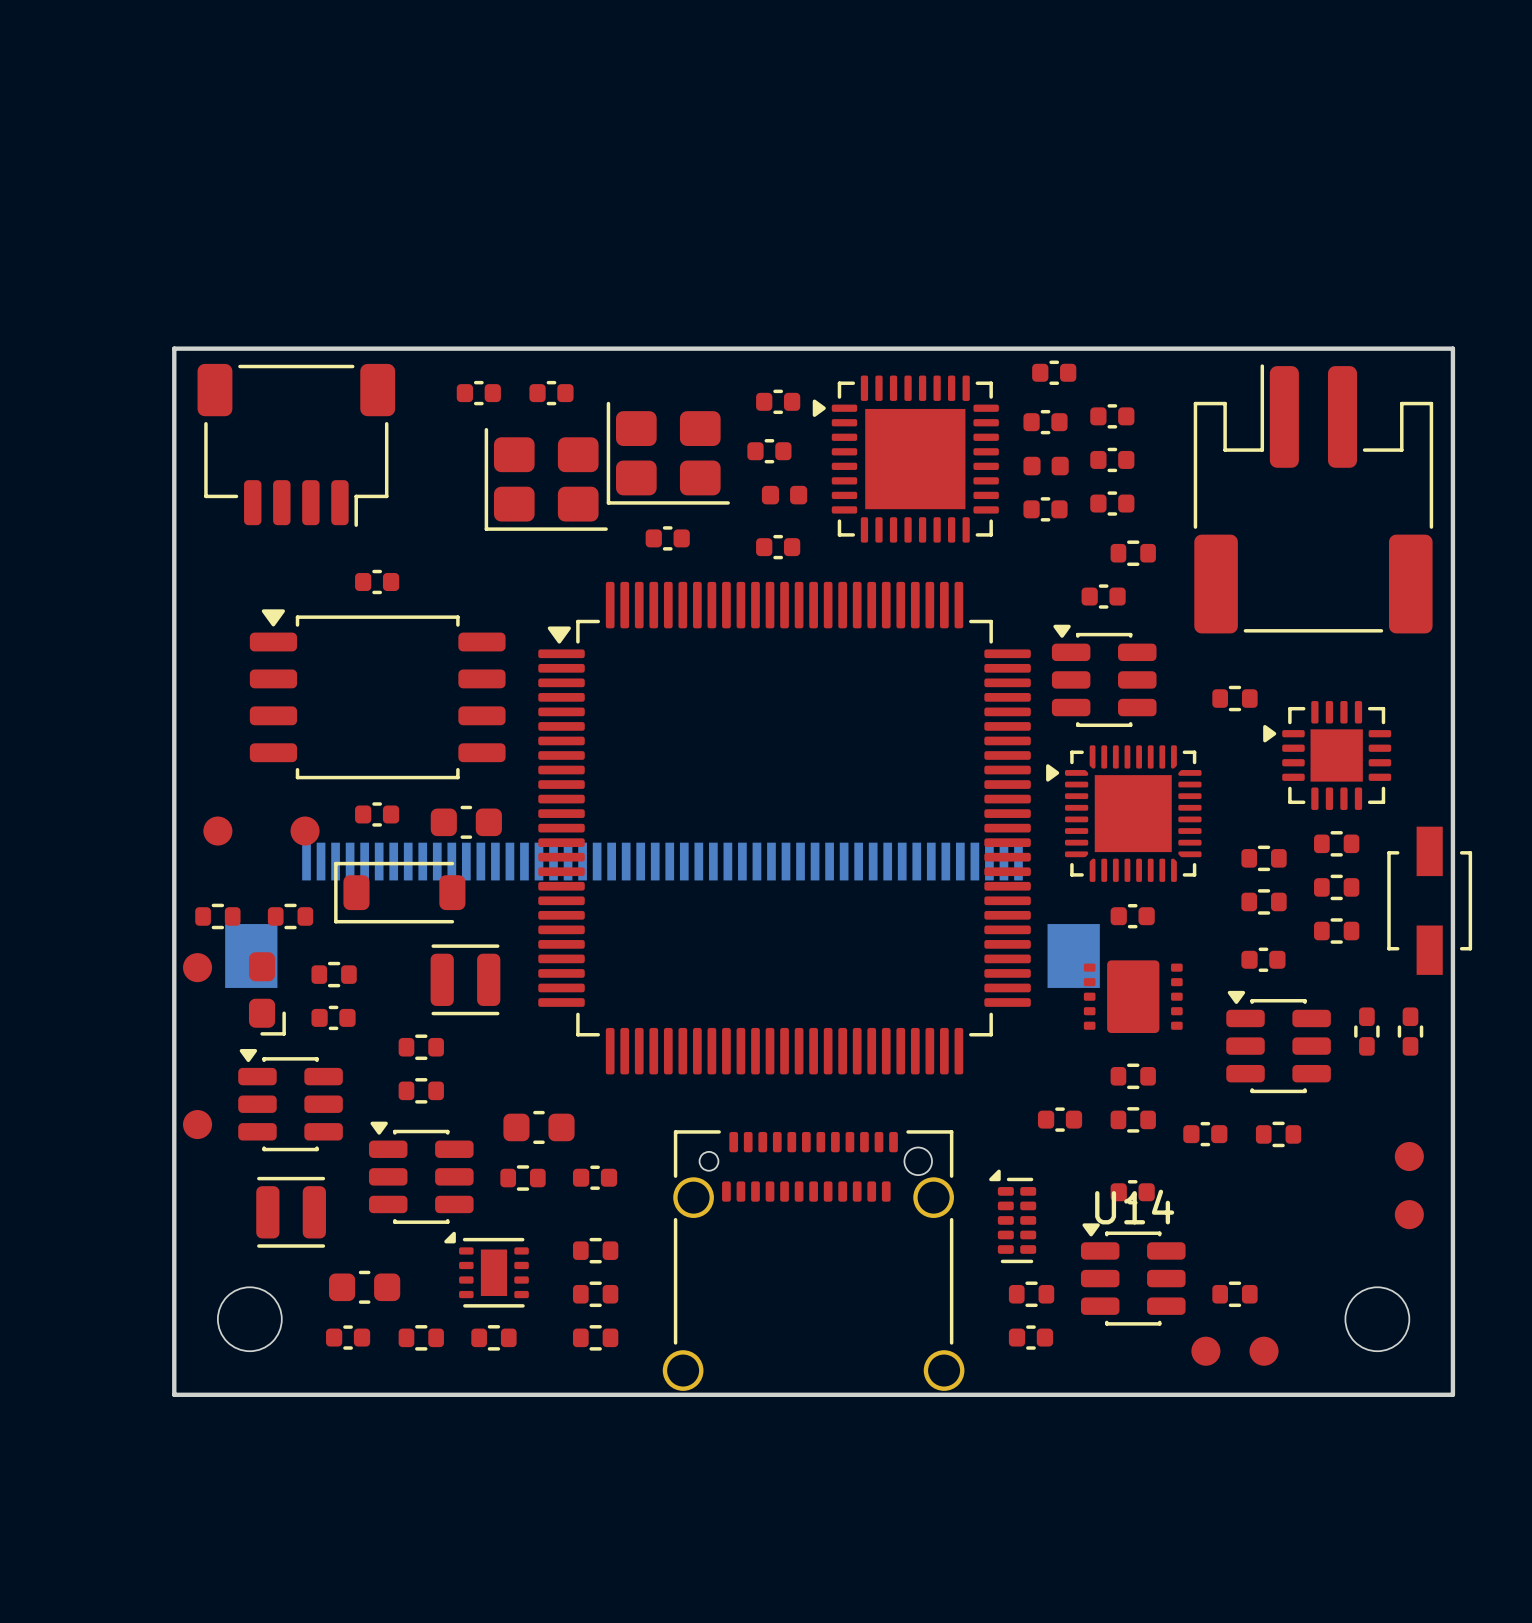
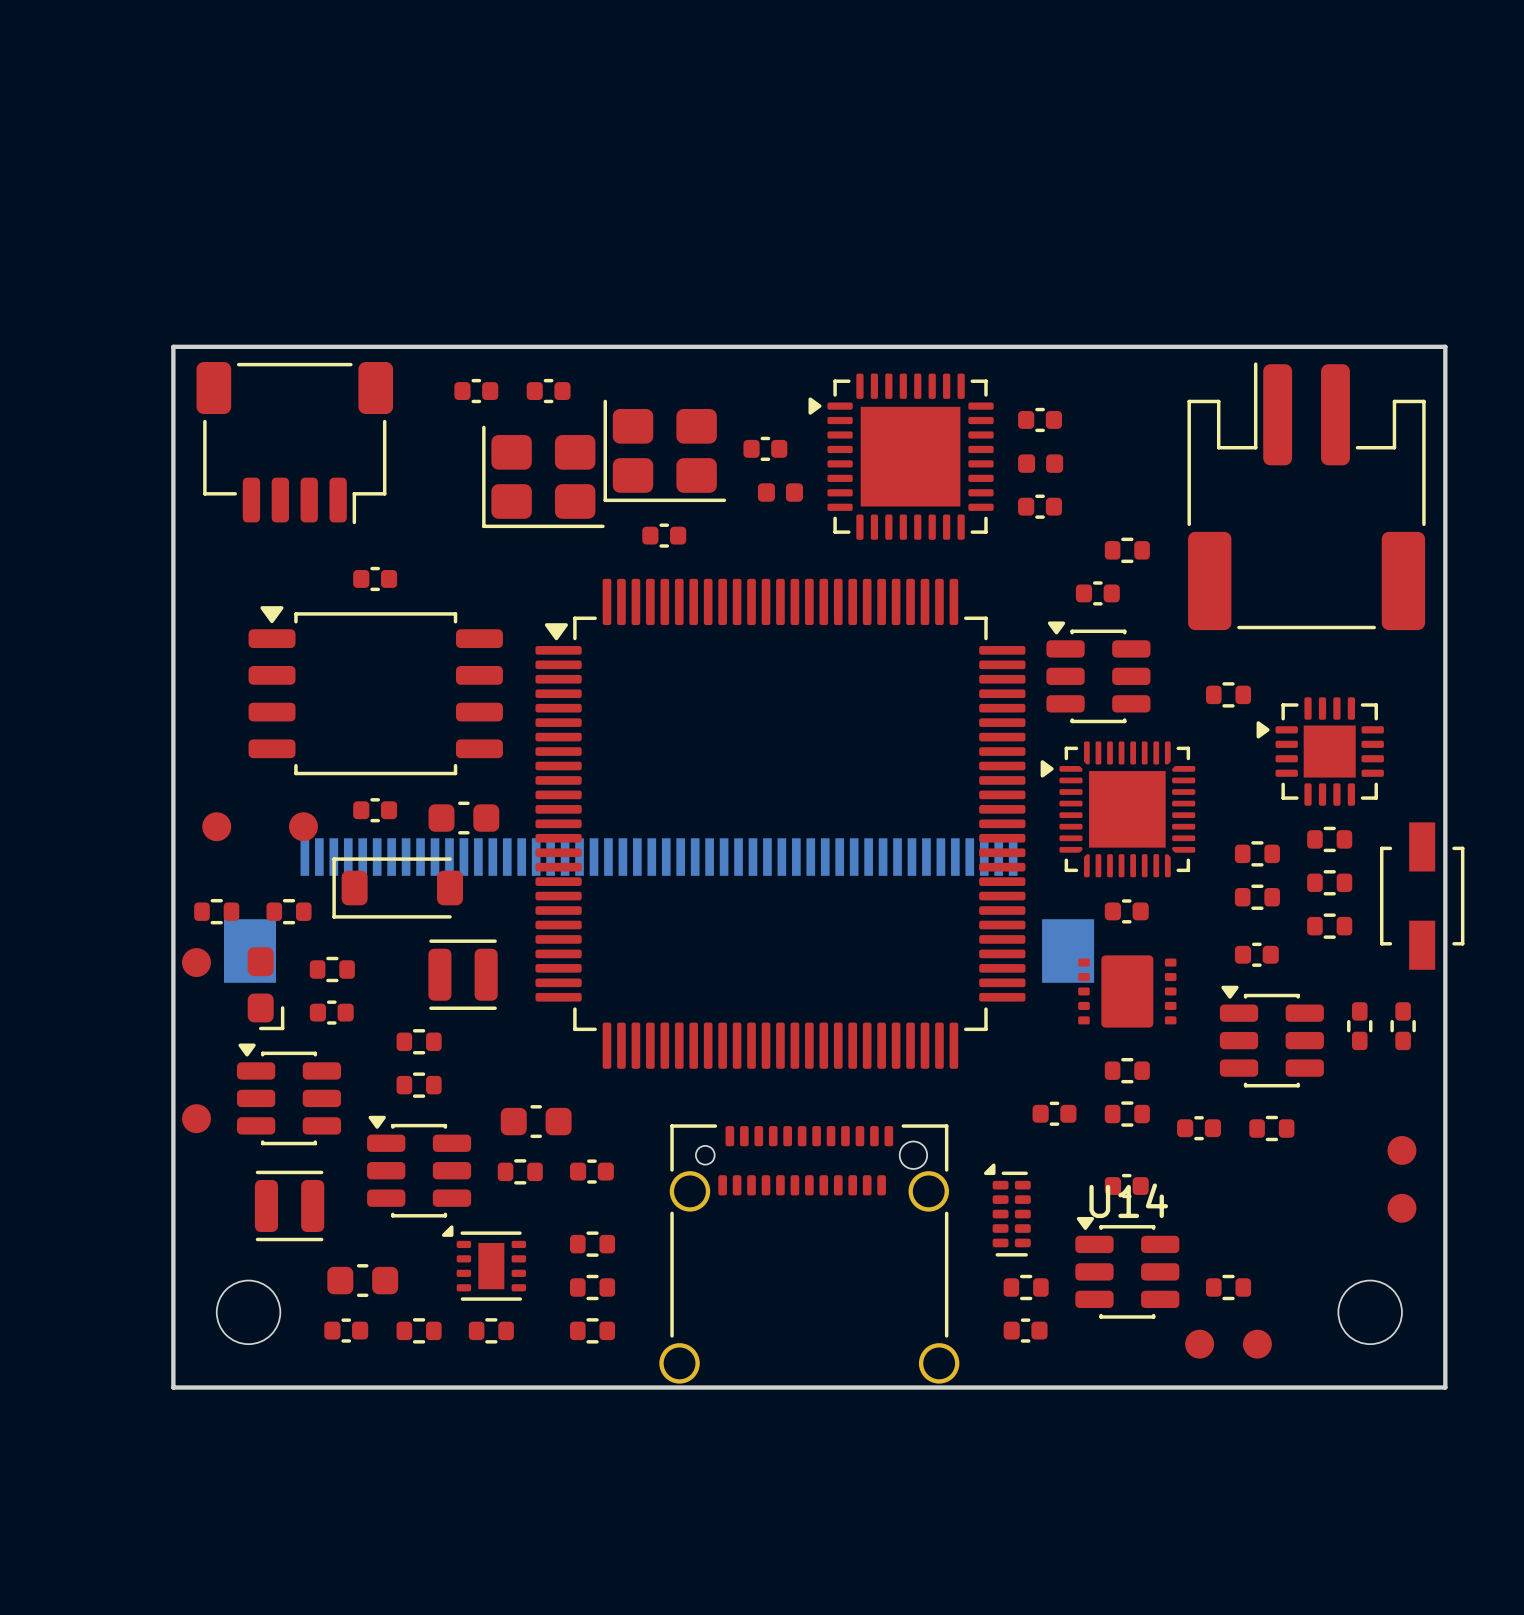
part: (1054, 372) -> none
part: (778, 401) -> none
part: (1112, 416) -> none
part: (1112, 459) -> none
part: (1112, 503) -> none
part: (778, 547) -> none

